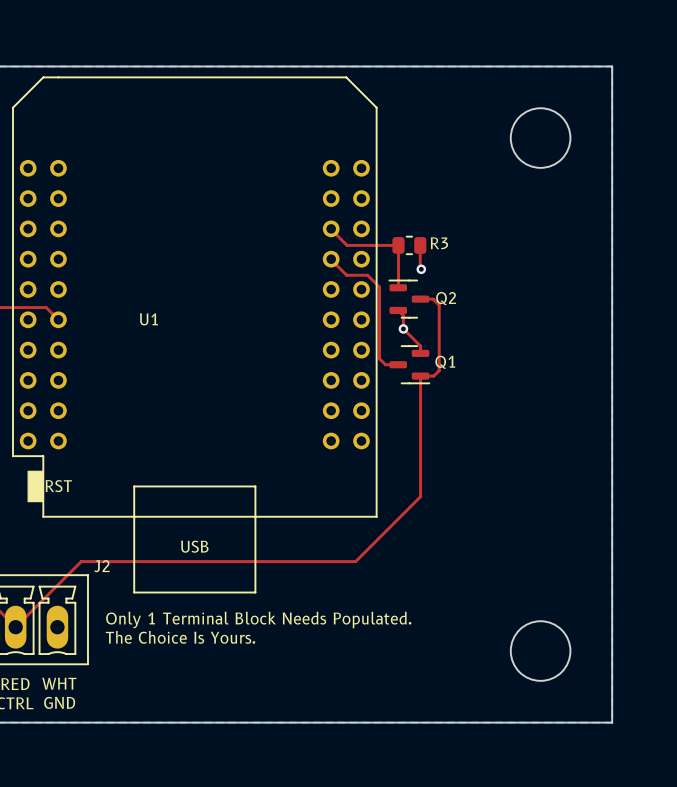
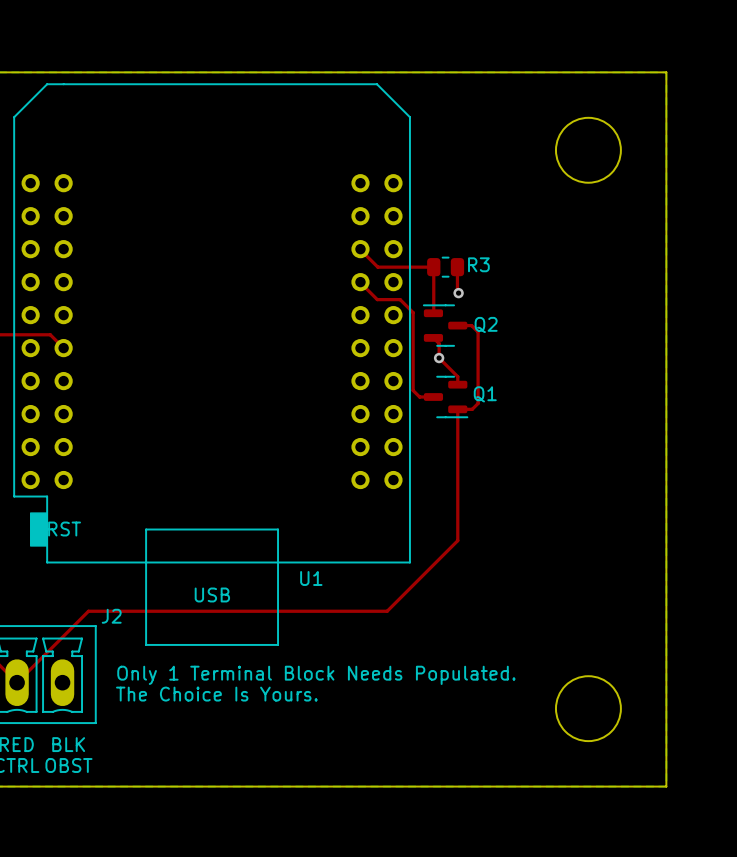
U1 name position: U1 (148, 319) -> U1 (311, 578)
text: WHT (59, 683) -> BLK (68, 744)
text: GND (59, 702) -> OBST (68, 765)

